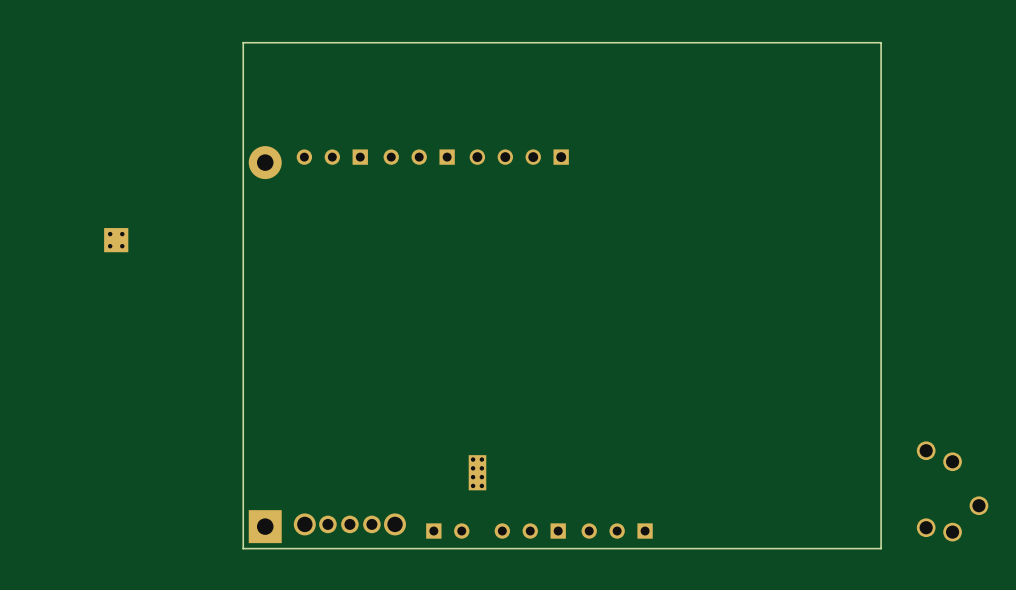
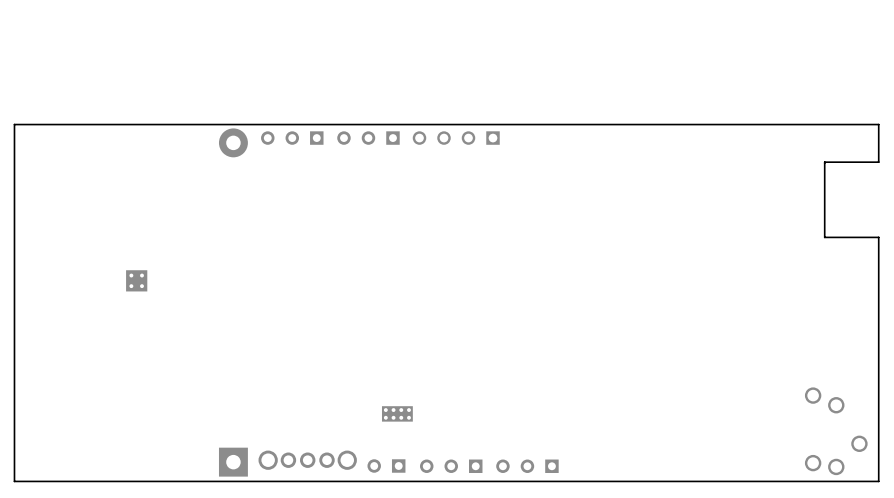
part position: (116, 240) -> (136, 280)
part rotation: 0° (477, 472) -> 90° clockwise (397, 413)
part position: (477, 472) -> (397, 413)
part rotation: 0° (447, 531) -> 180° (386, 466)
part position: (530, 531) -> (451, 466)
part position: (617, 531) -> (527, 466)
board edge: (881, 548) (881, 42) (243, 42) (243, 548) -> (773, 481) (878, 481) (878, 237) (824, 237) (824, 162) (878, 162) (878, 124) (14, 124) (14, 481) (214, 481)

